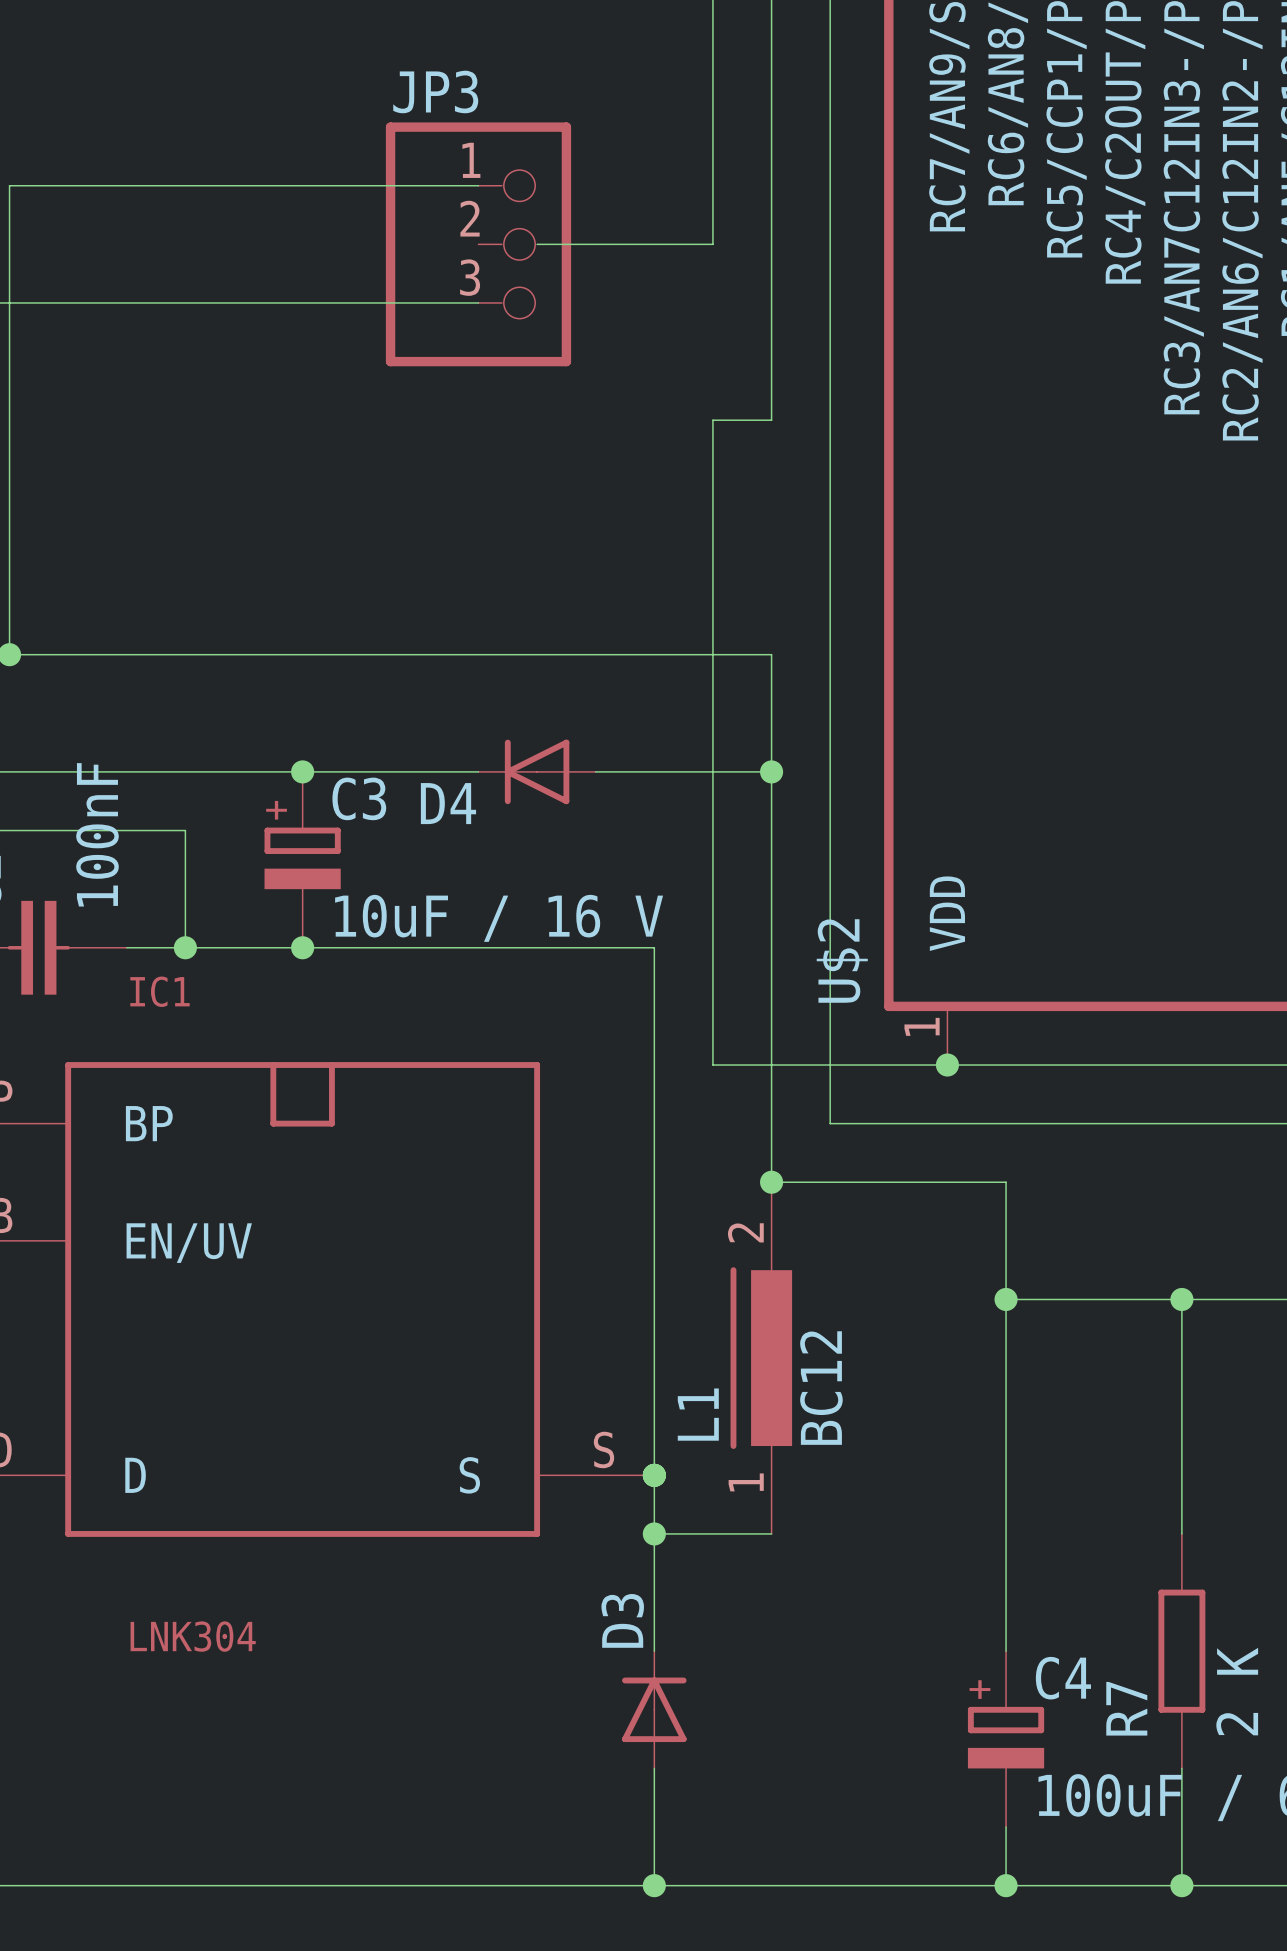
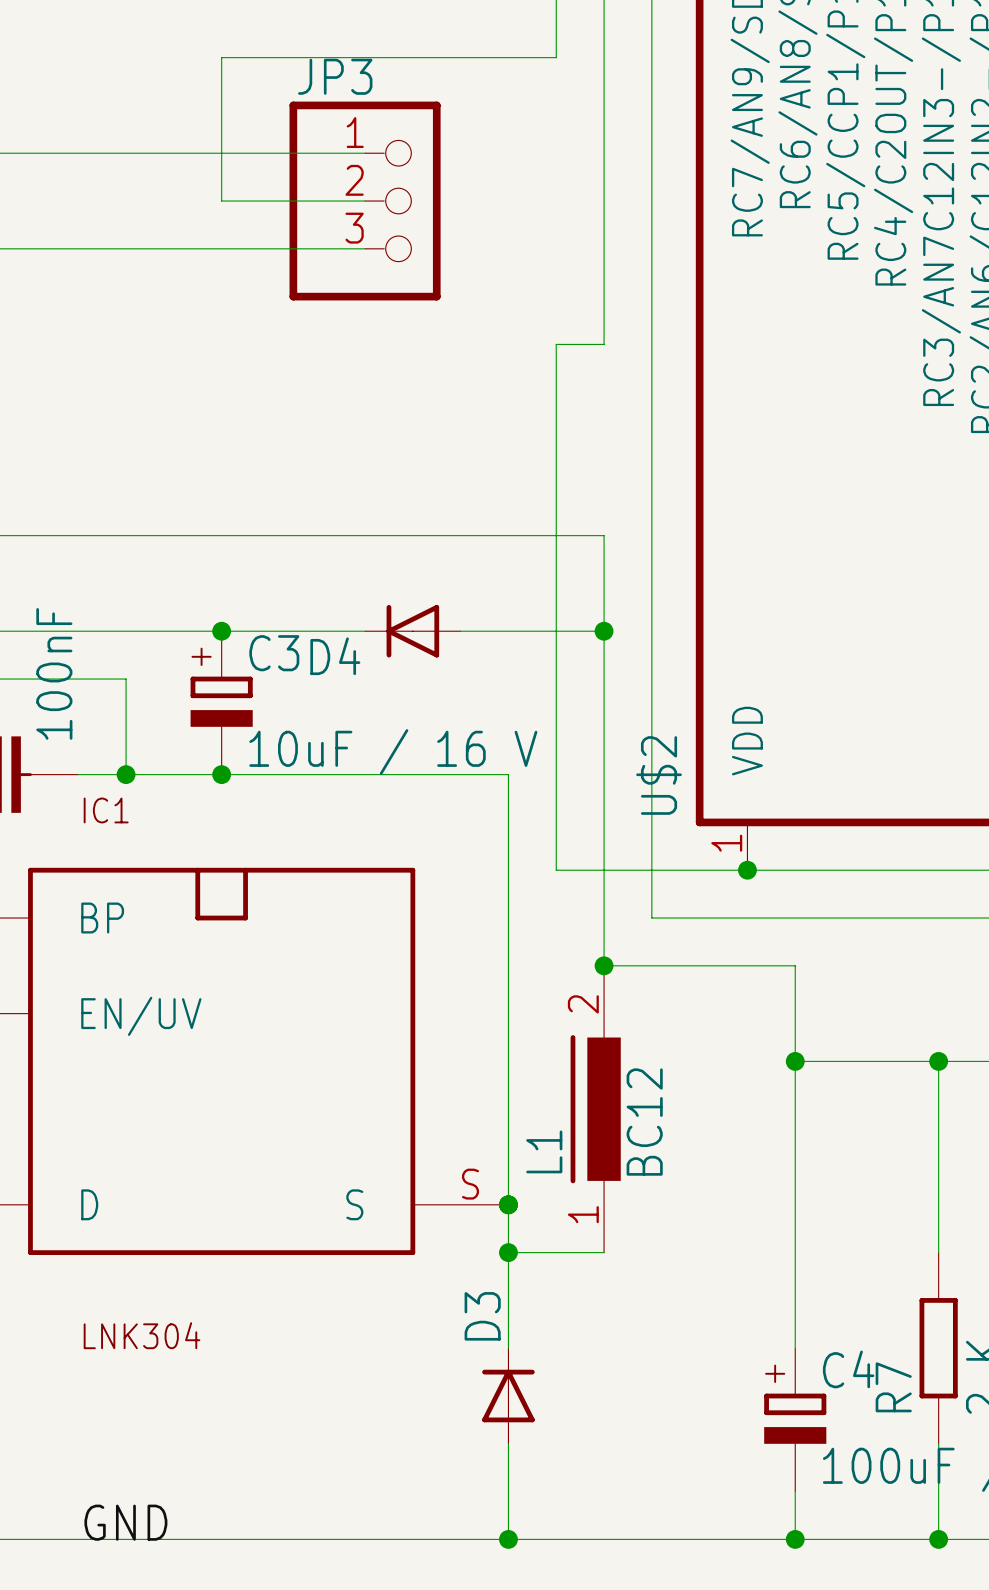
wire: (712, 68) (712, 244) (537, 244) -> (556, 57) (221, 57) (221, 201) (365, 201)
label: none -> GND (125, 1522)

